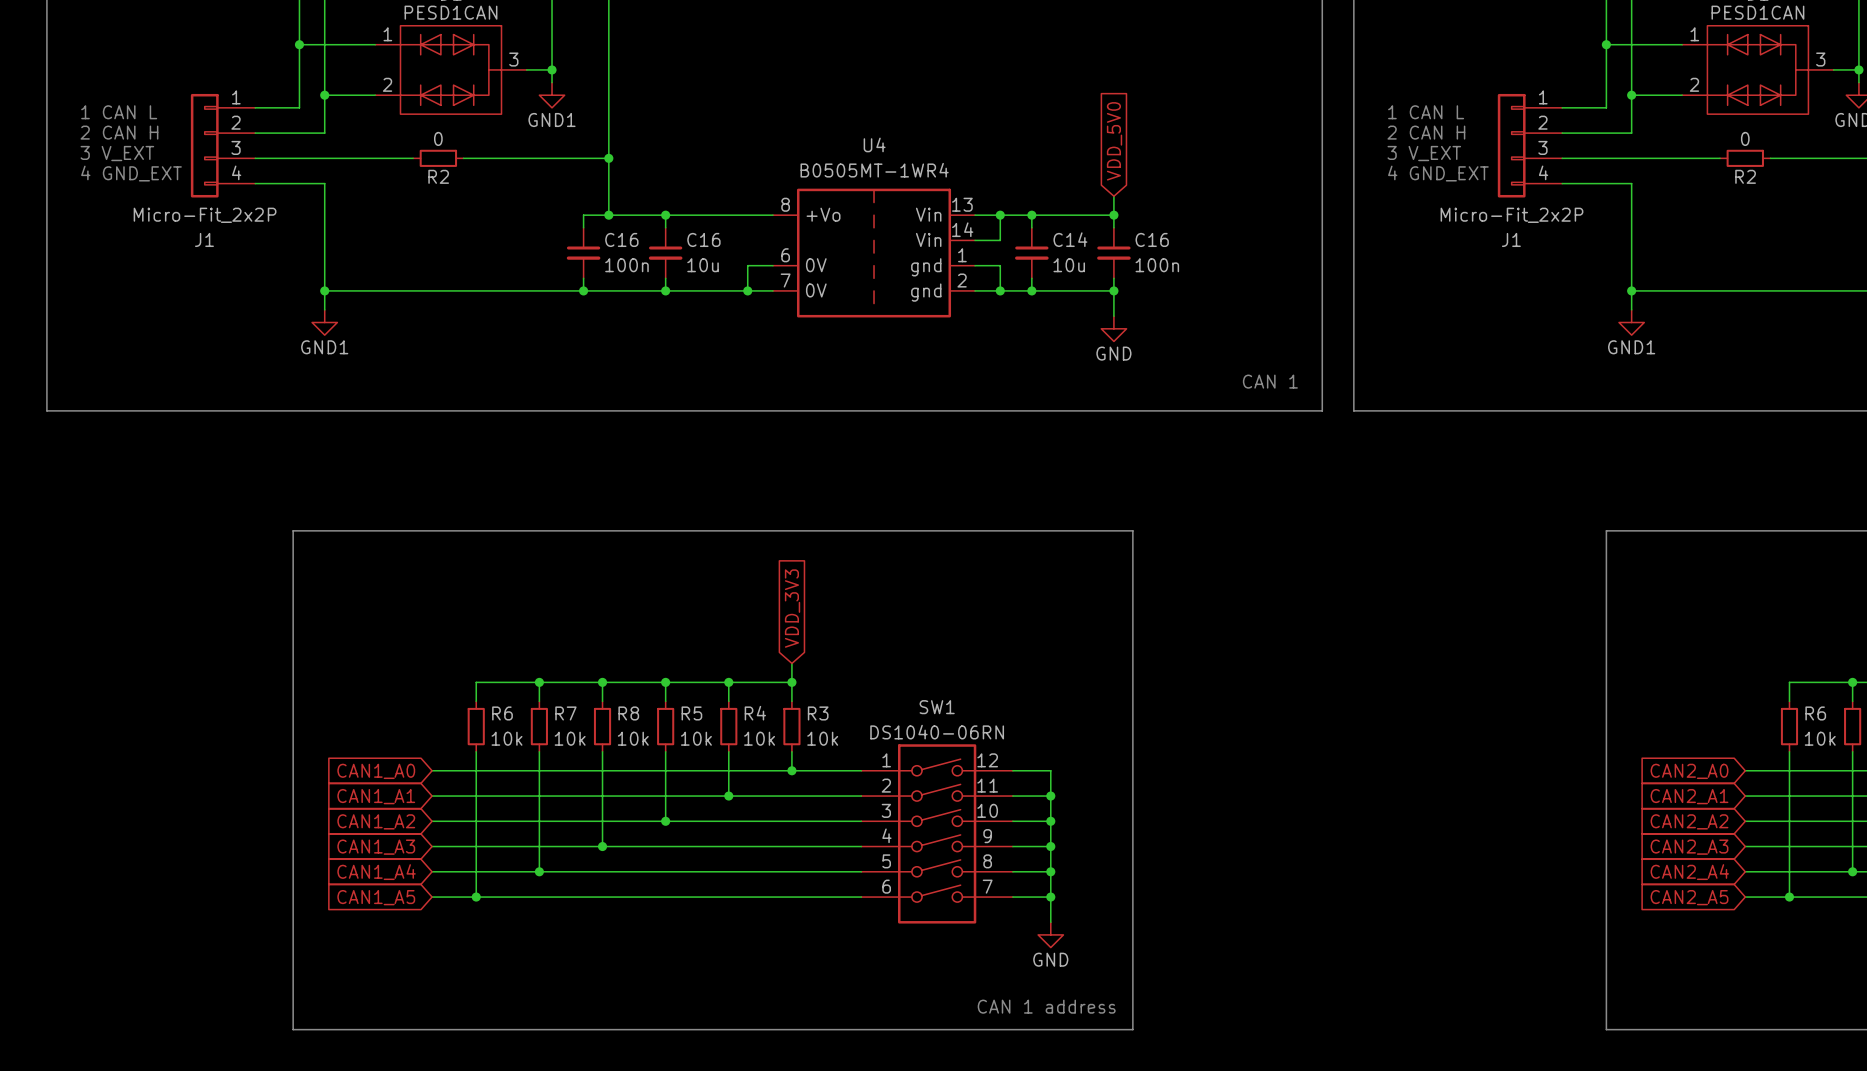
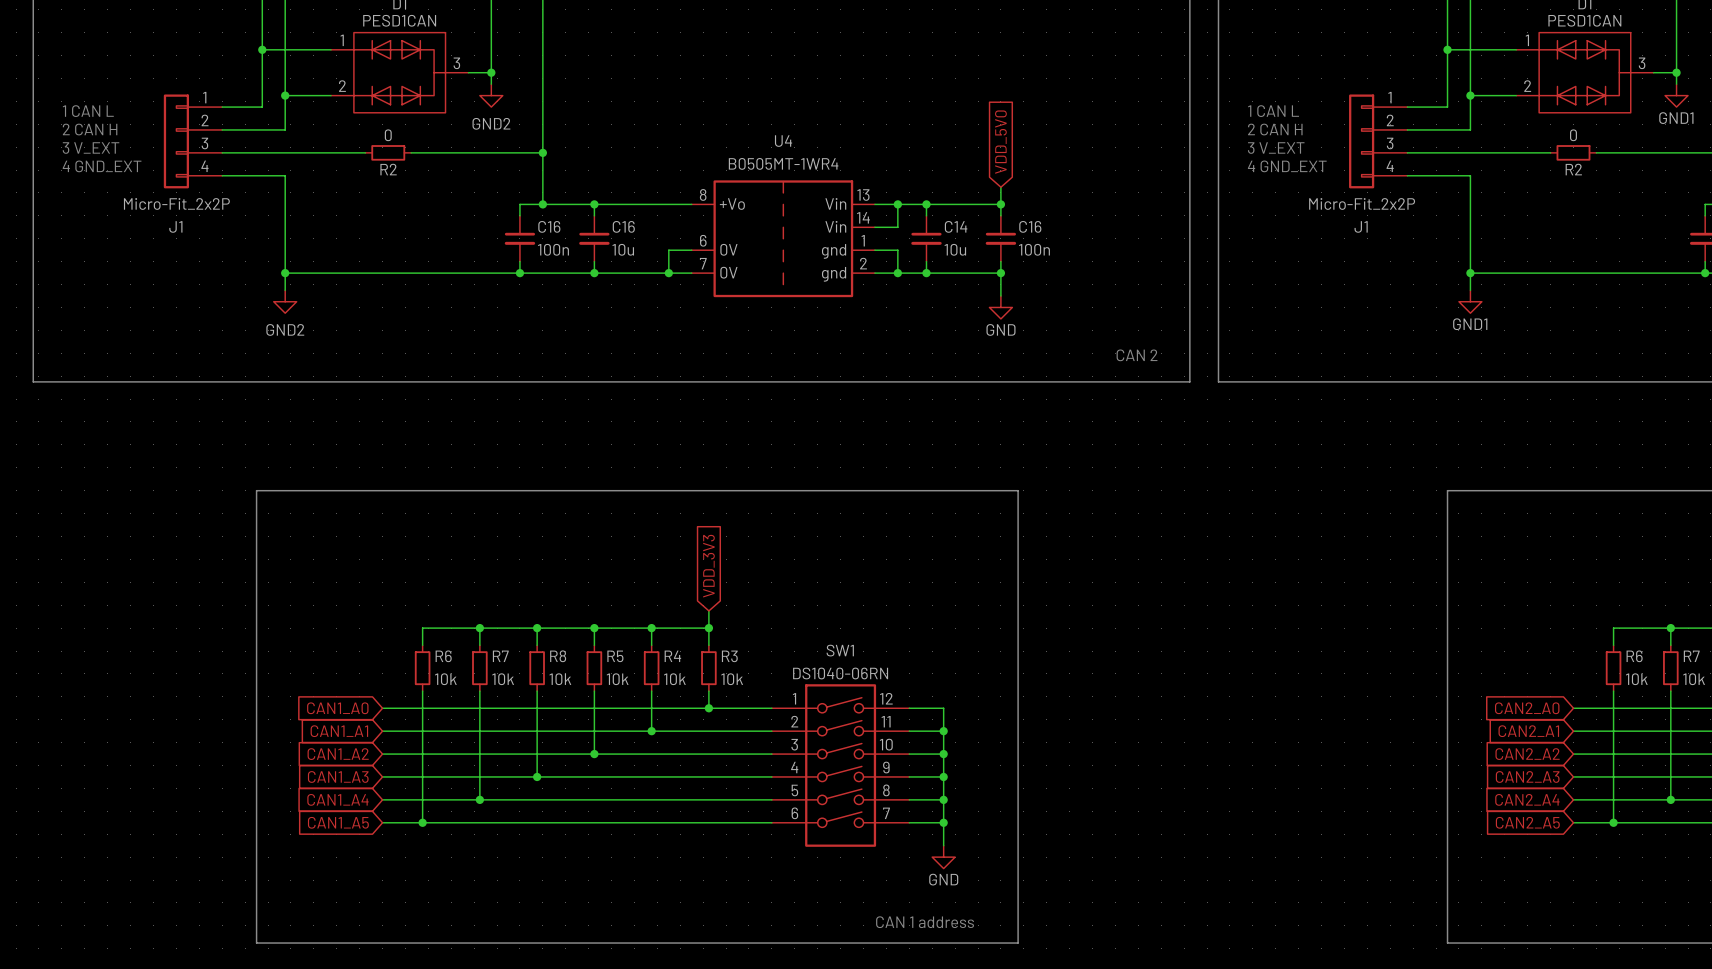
power symbol: GND1 (552, 95) -> GND2 (491, 95)
power symbol: GND1 (324, 322) -> GND2 (285, 301)
text: CAN 1 (1270, 381) -> CAN 2 (1137, 355)

